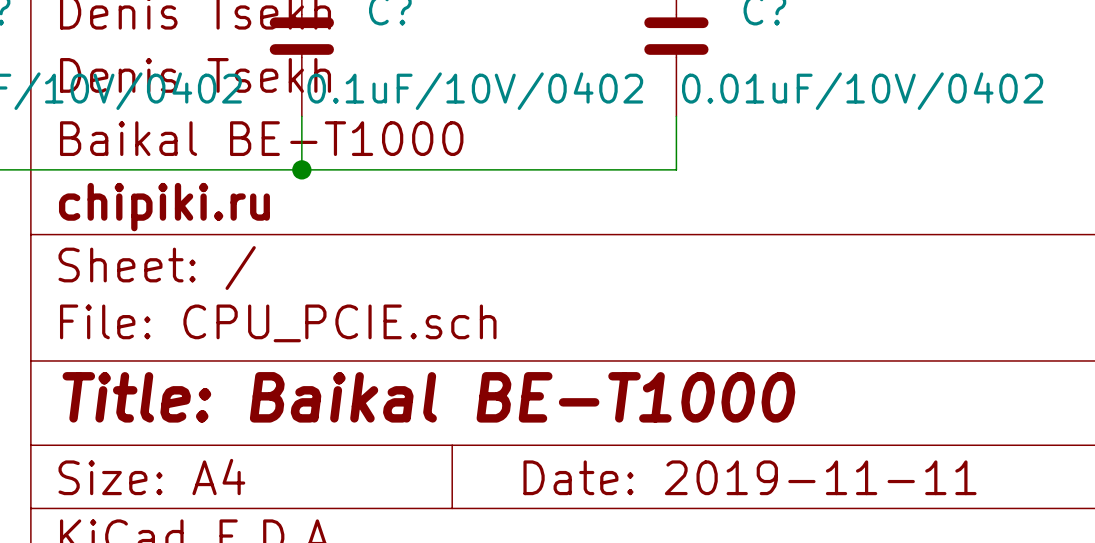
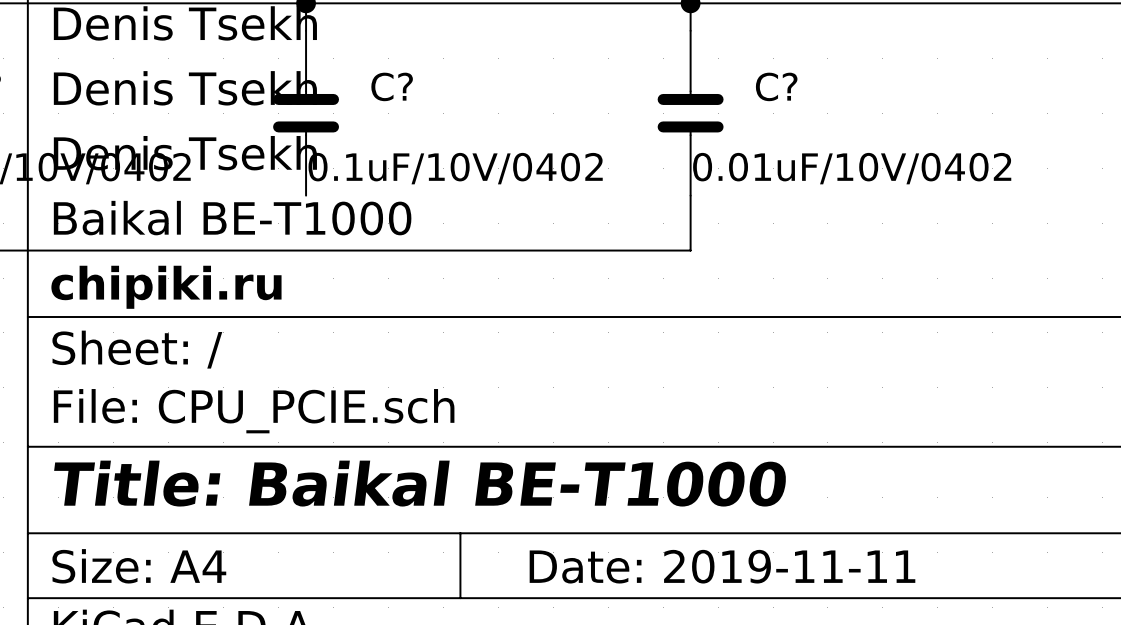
wire: (301, 116) (301, 169) -> none
junction: (301, 169) -> none

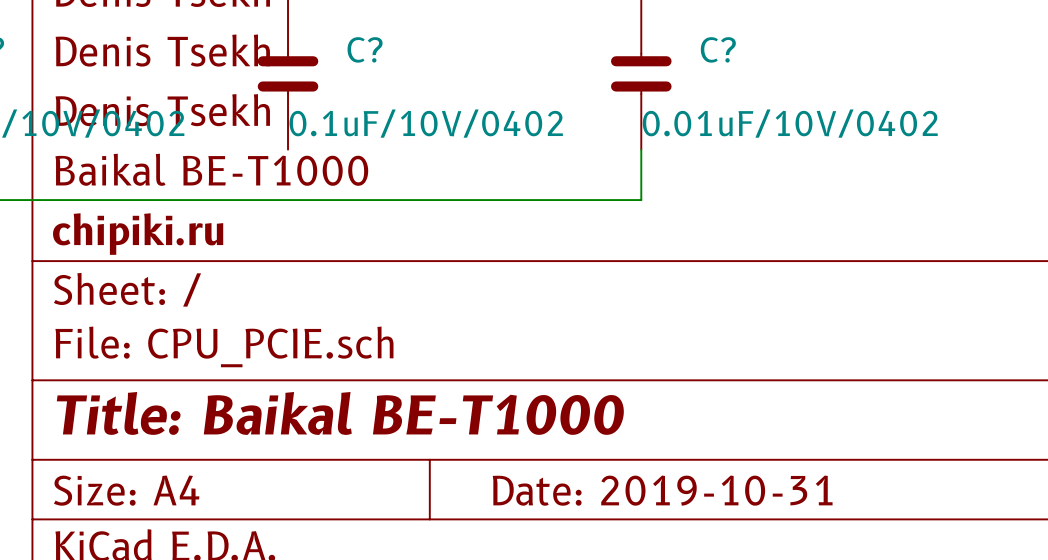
title block: Date: 2019-11-11 (722, 566) -> Date: 2019-10-31 (662, 490)

